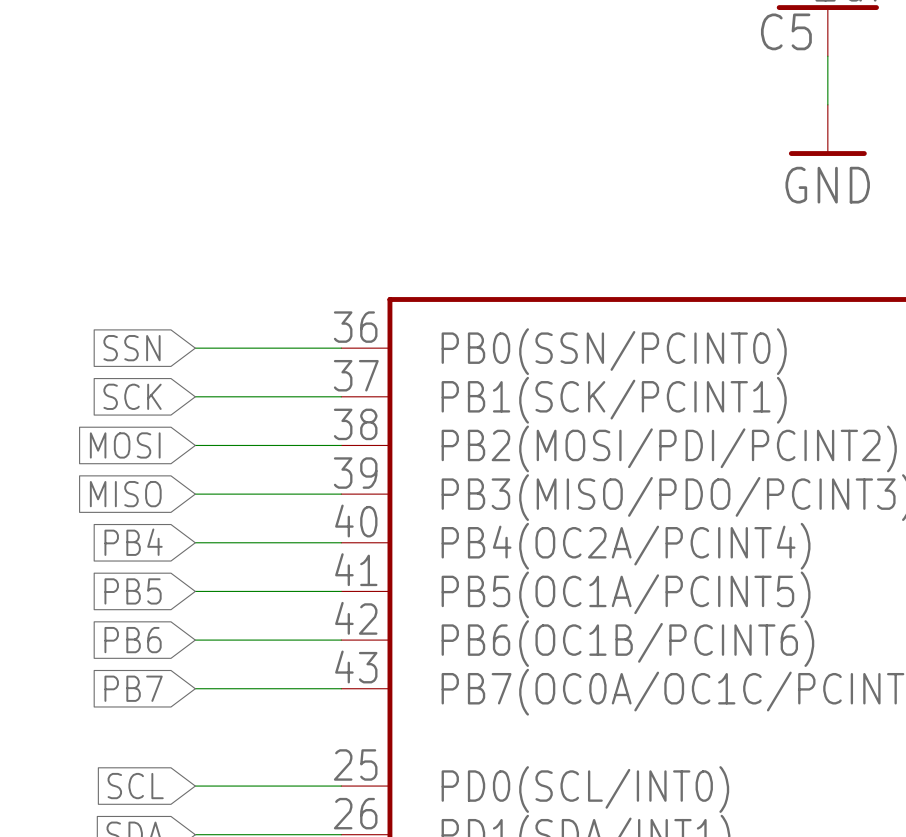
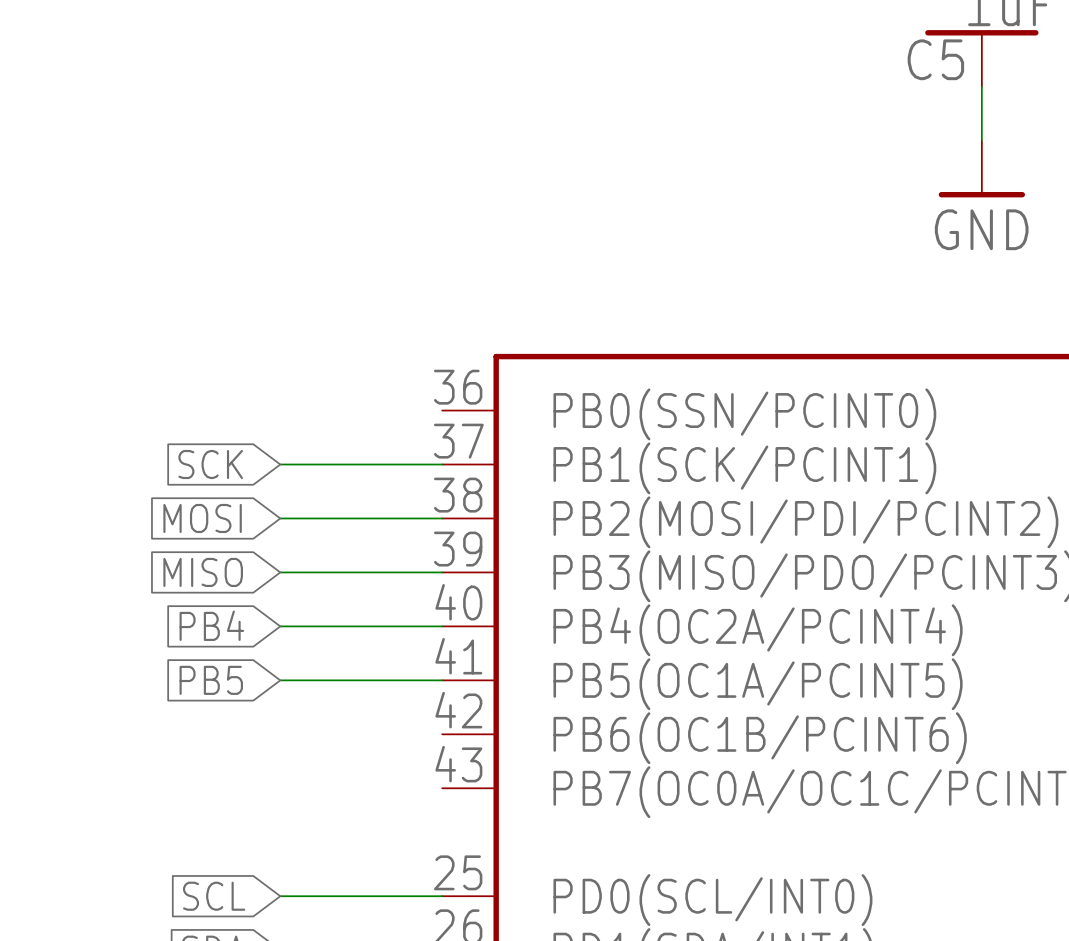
global label: SSN (132, 348) -> none
wire: (195, 348) (341, 348) -> none
global label: PB6 (133, 640) -> none
wire: (195, 640) (341, 640) -> none
global label: PB7 (133, 688) -> none
wire: (195, 688) (341, 688) -> none

